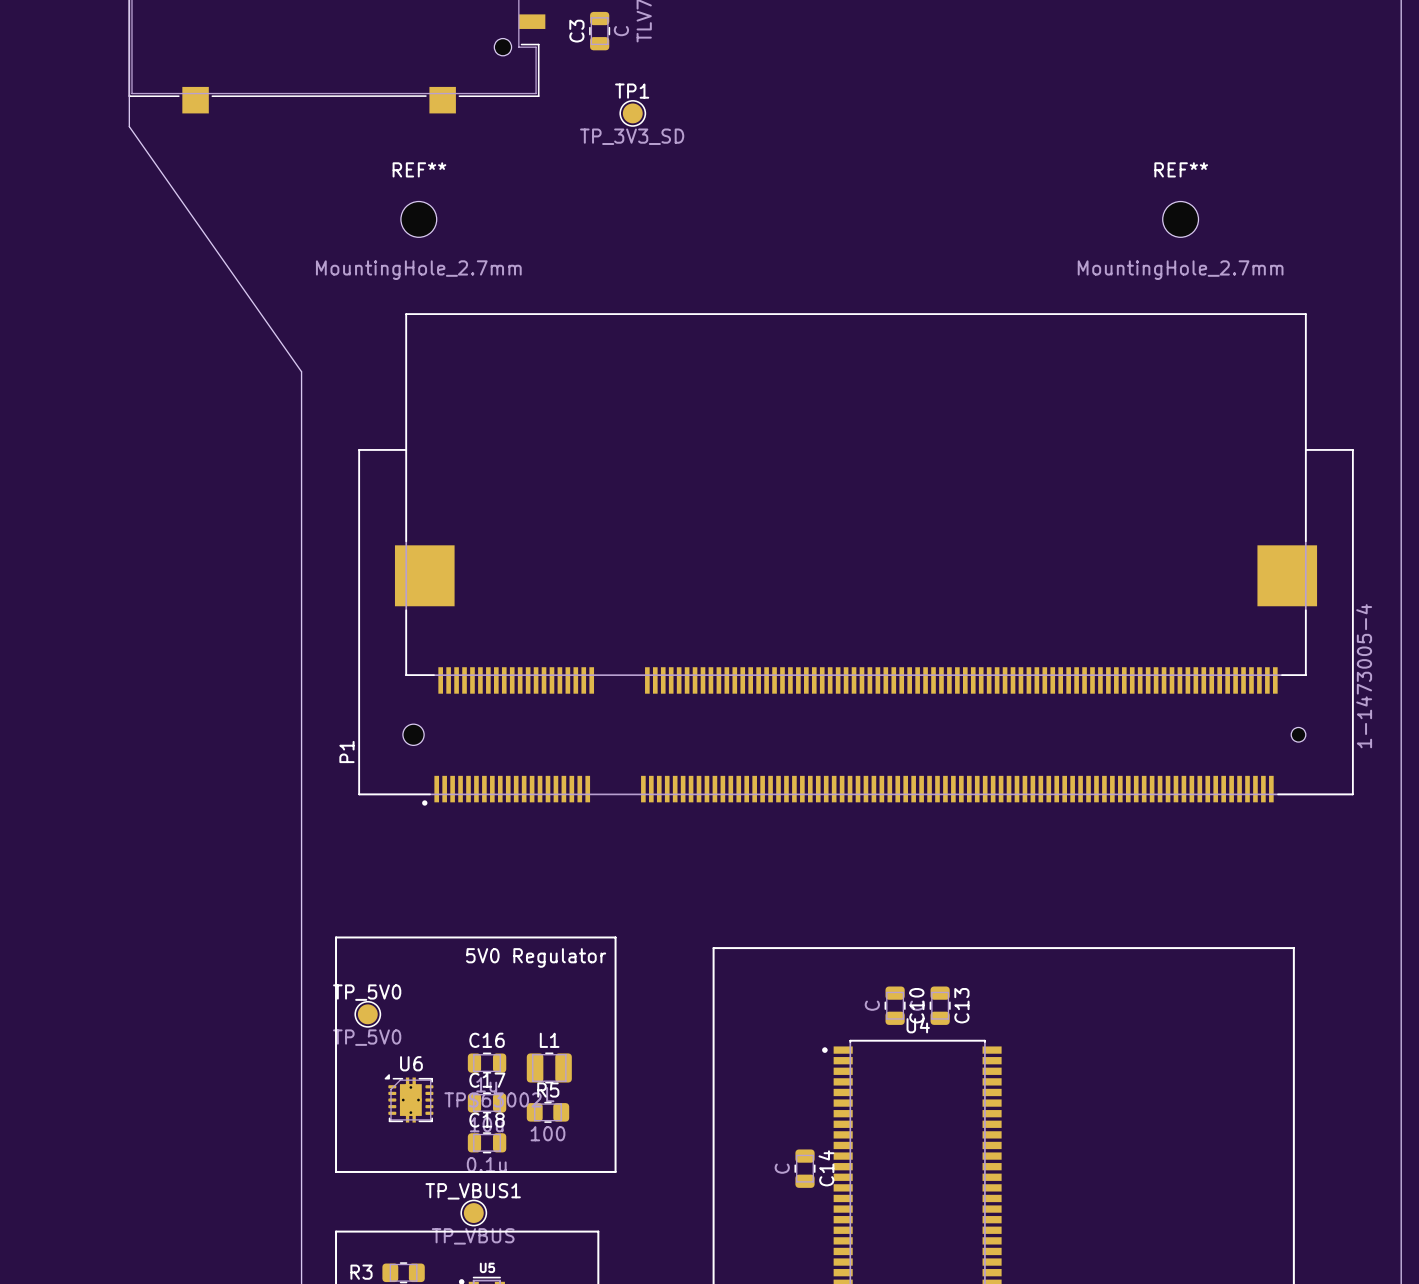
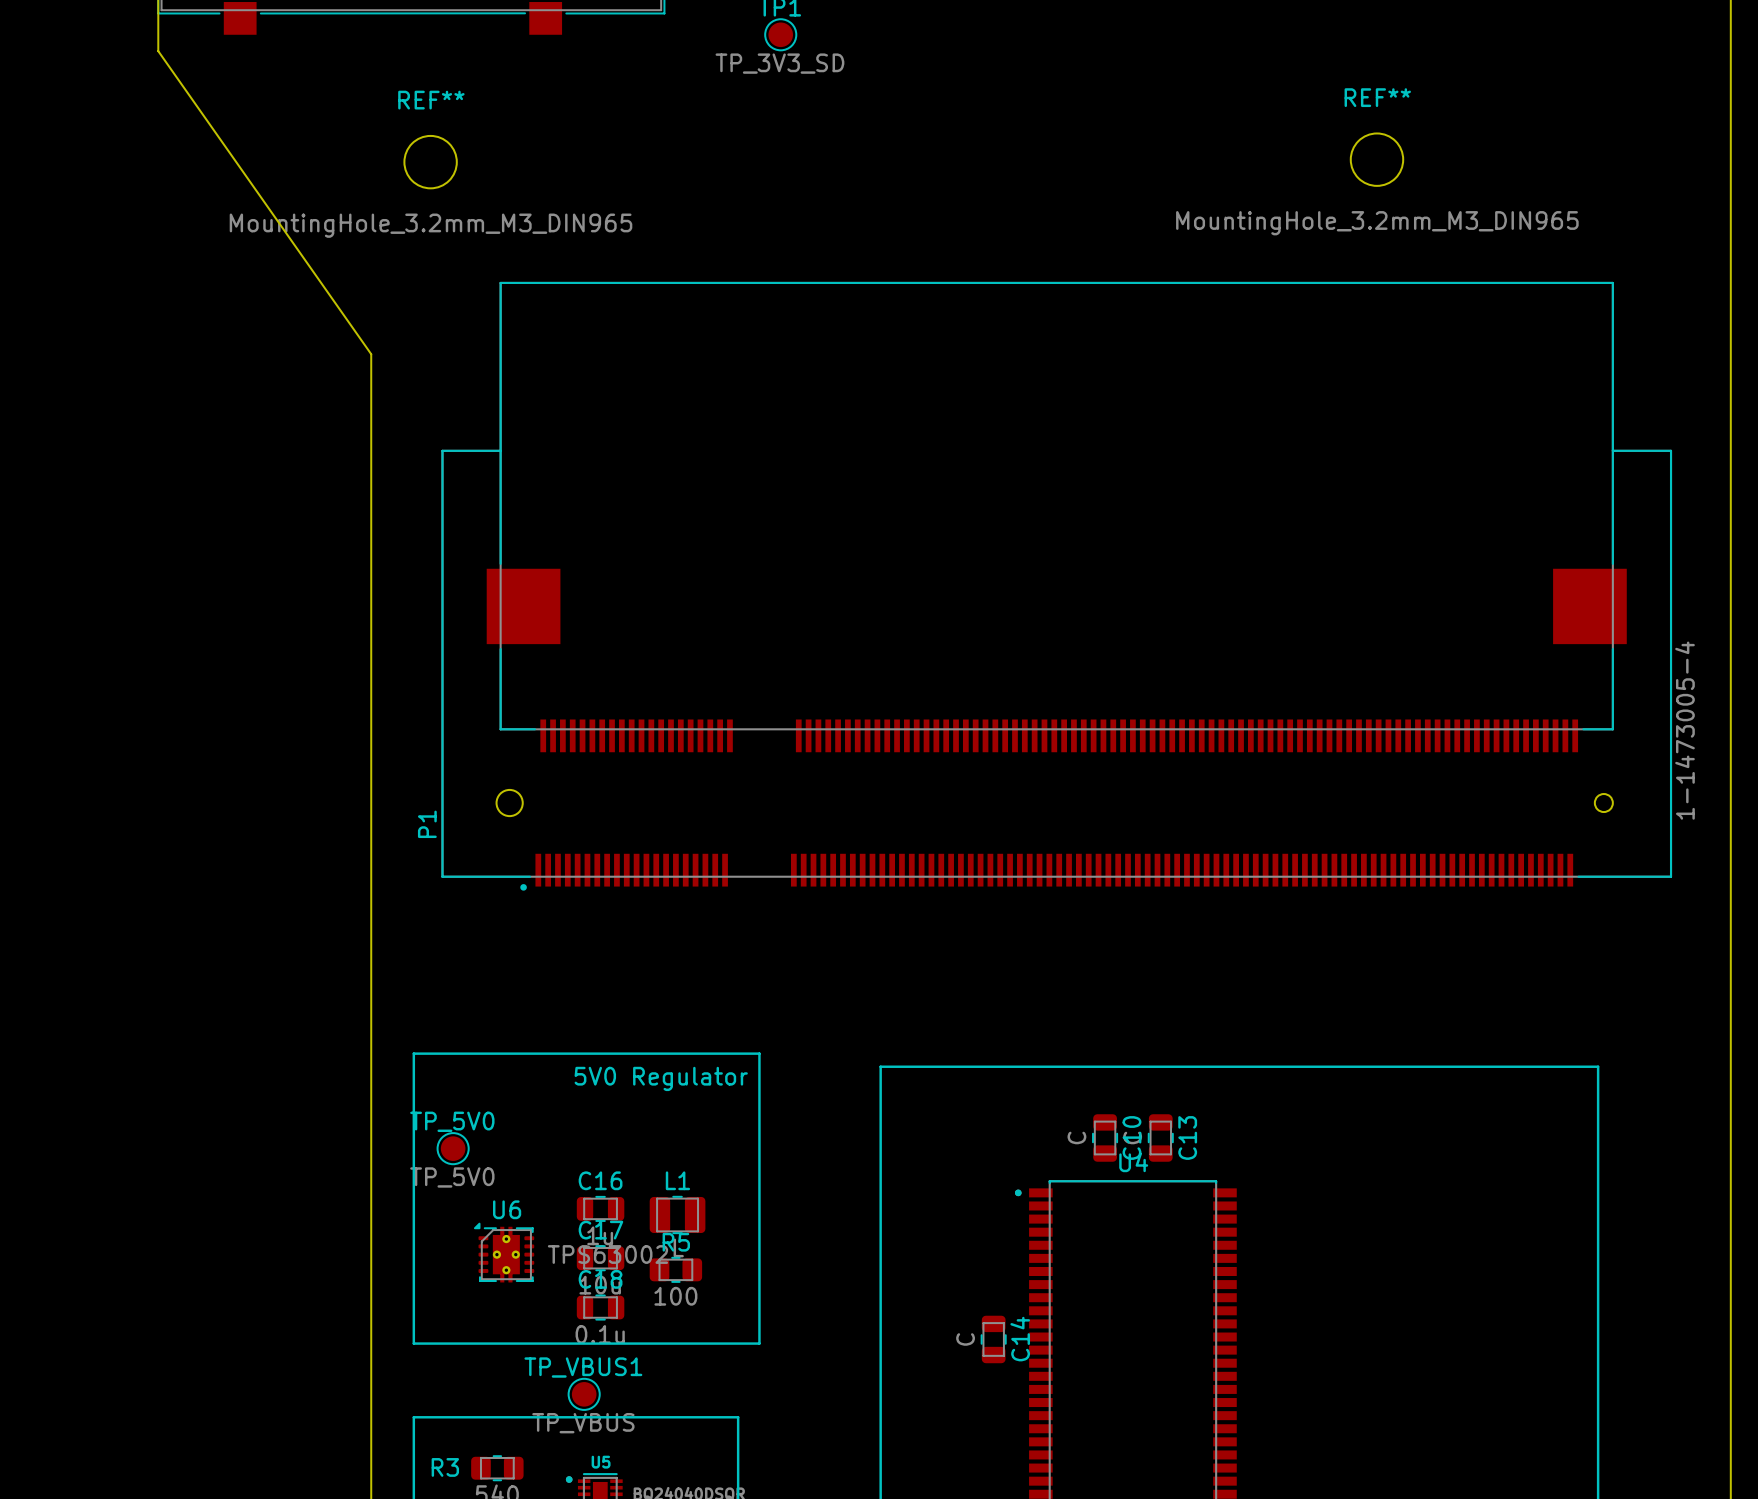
REF**: none -> MountingHole_3.2mm_M3_DIN965 (1376, 159)
REF**: none -> MountingHole_3.2mm_M3_DIN965 (430, 162)
REF**: MountingHole_2.7mm (418, 219) -> none
REF**: MountingHole_2.7mm (1180, 219) -> none

